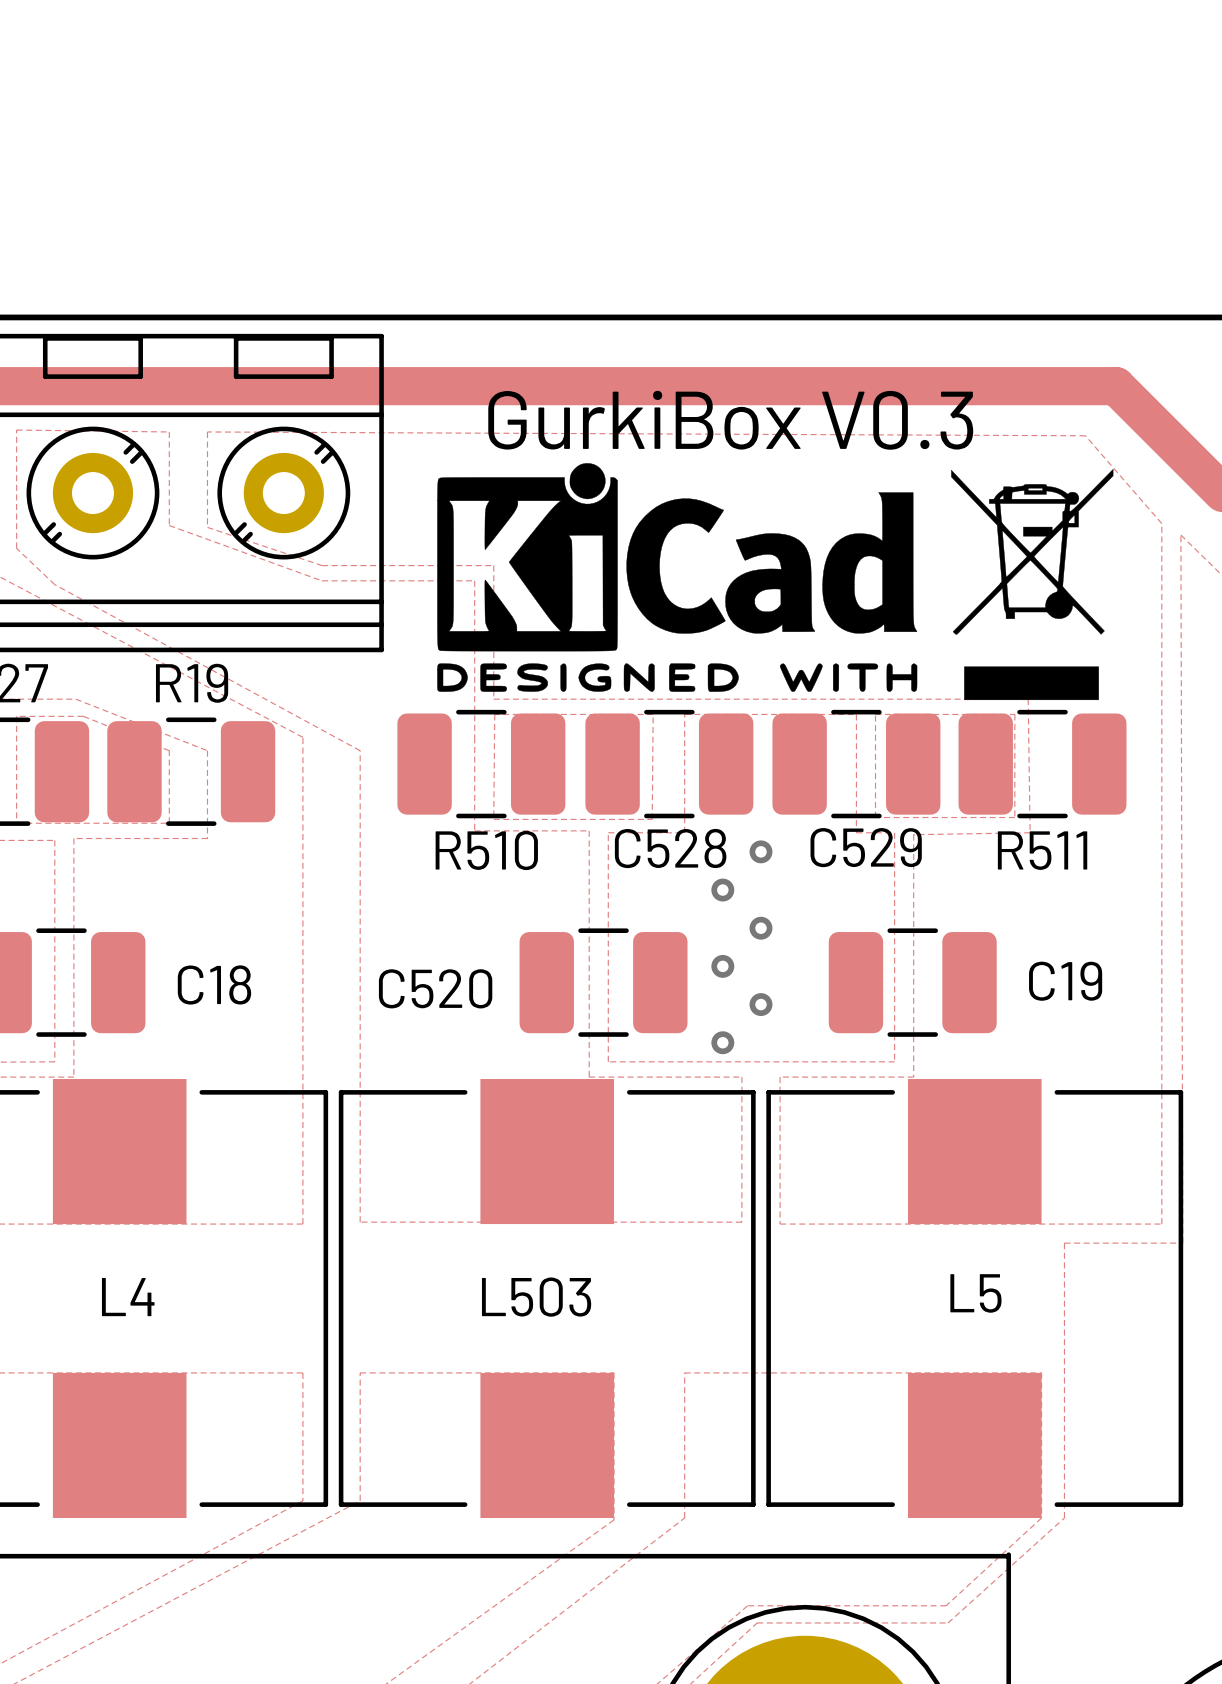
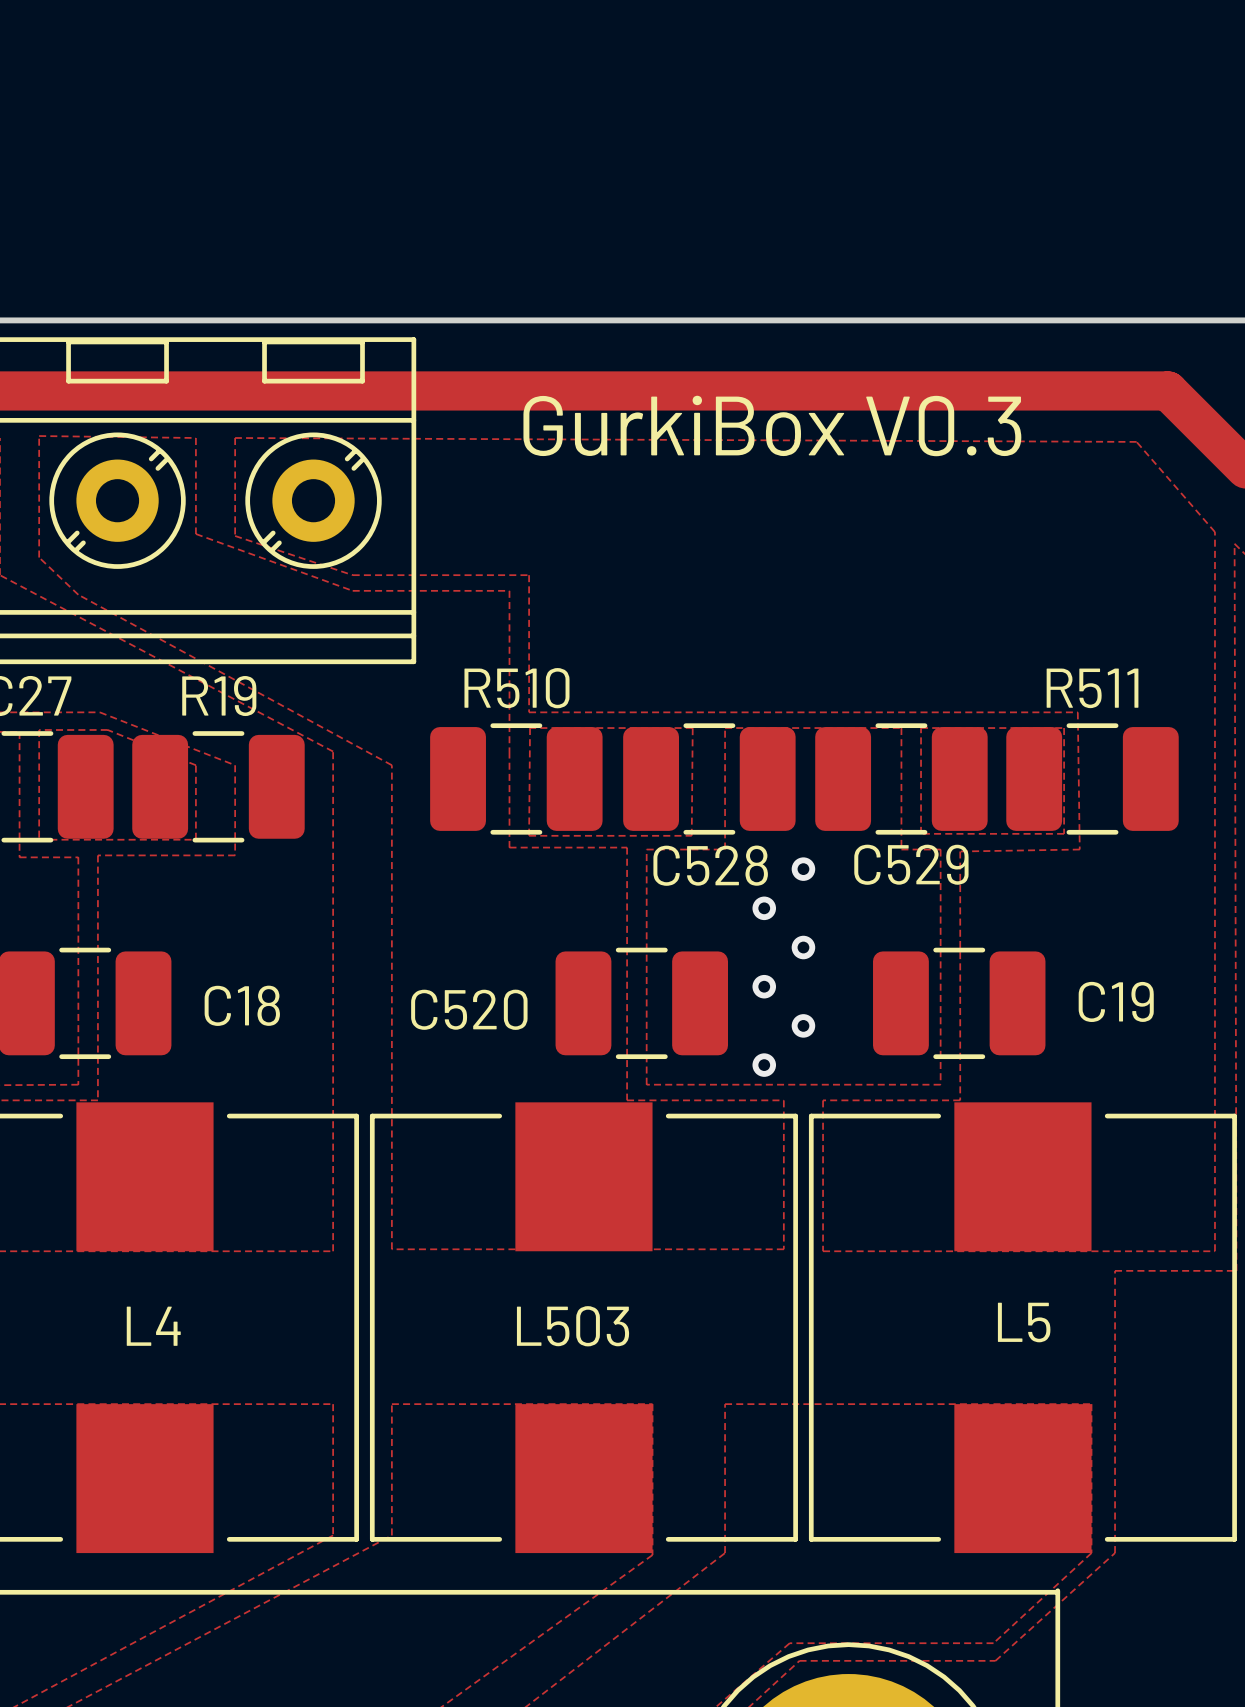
drawing: [437, 463, 1114, 701] -> none
R510 name position: R510 (486, 850) -> R510 (516, 688)
R511 name position: R511 (1042, 850) -> R511 (1092, 688)

